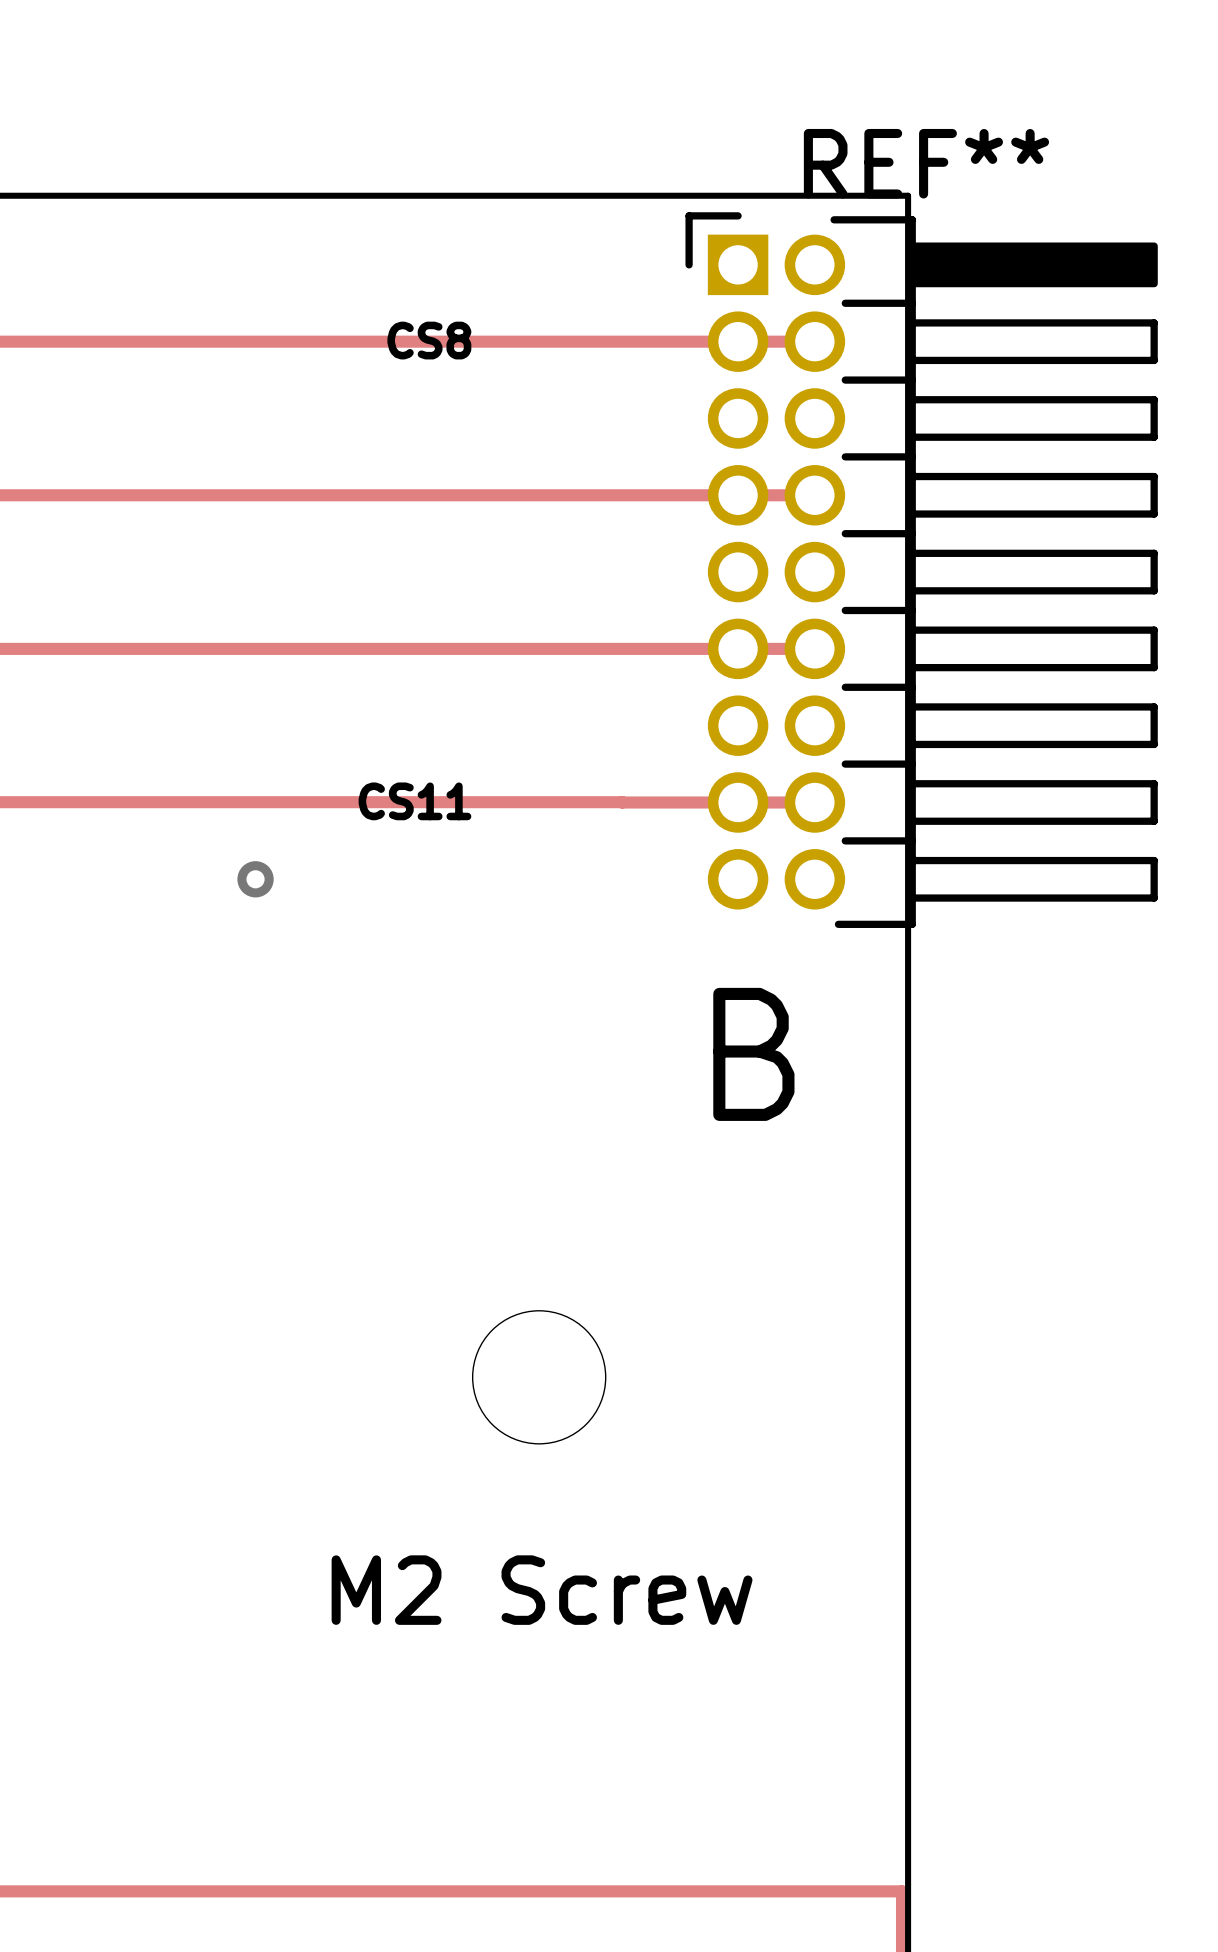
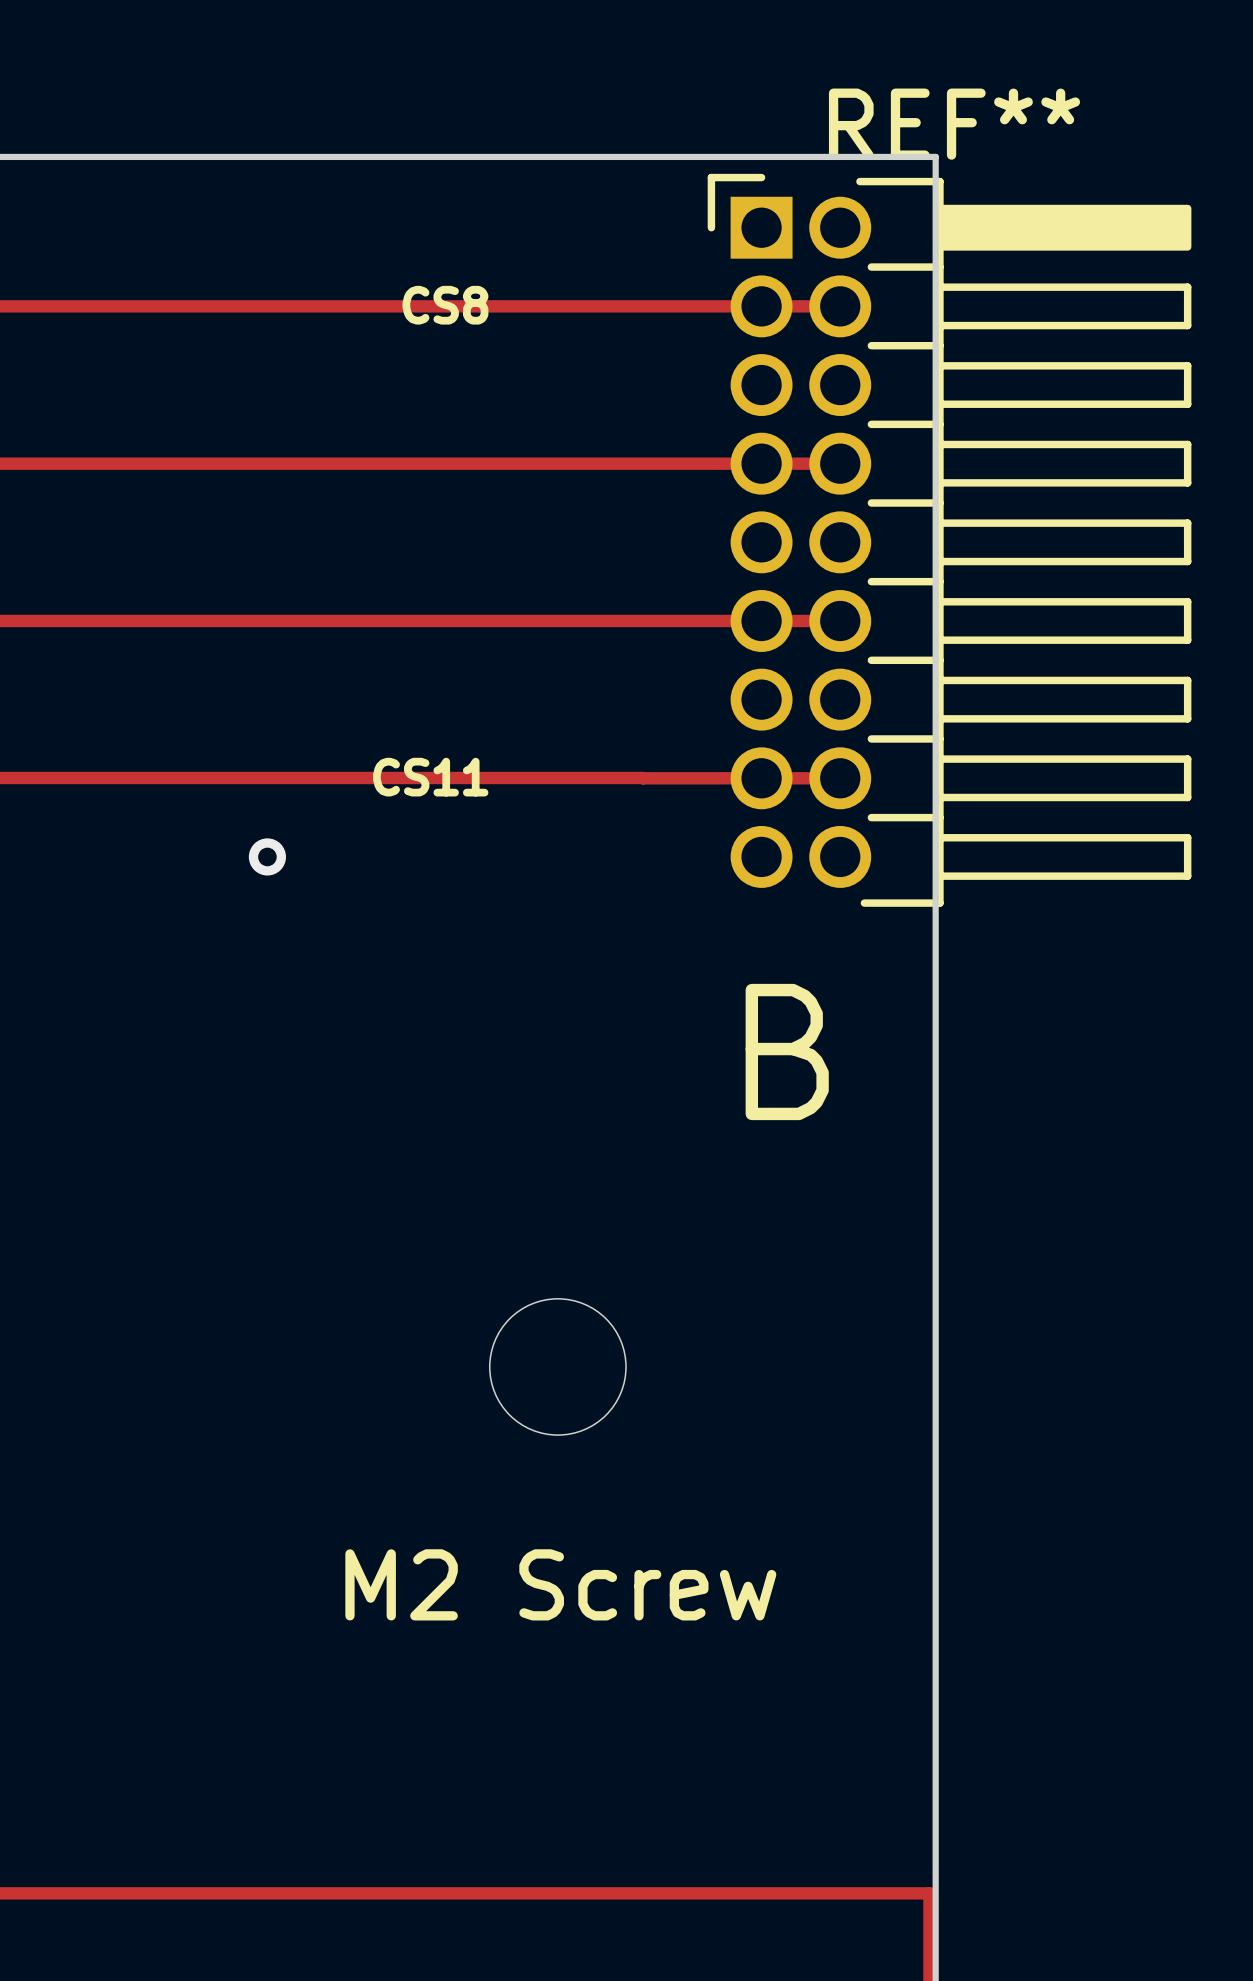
text position: B (753, 1054) -> B (787, 1051)

